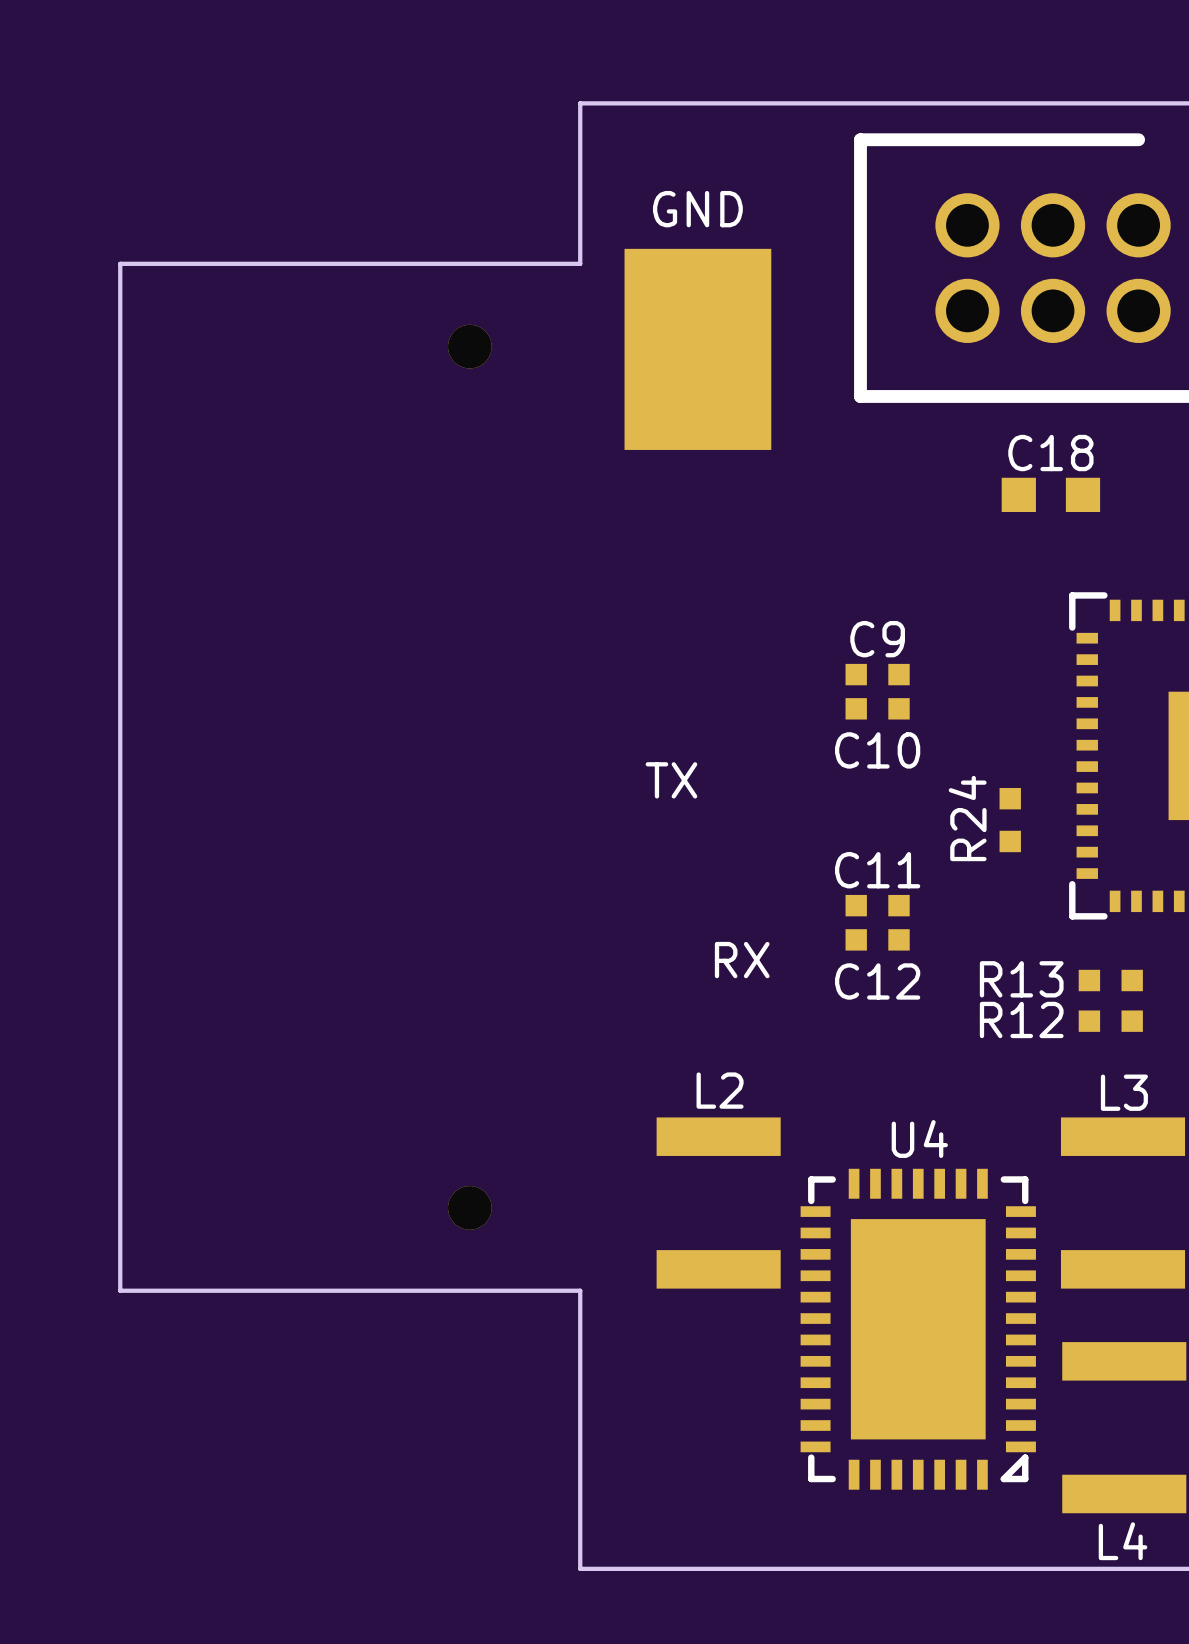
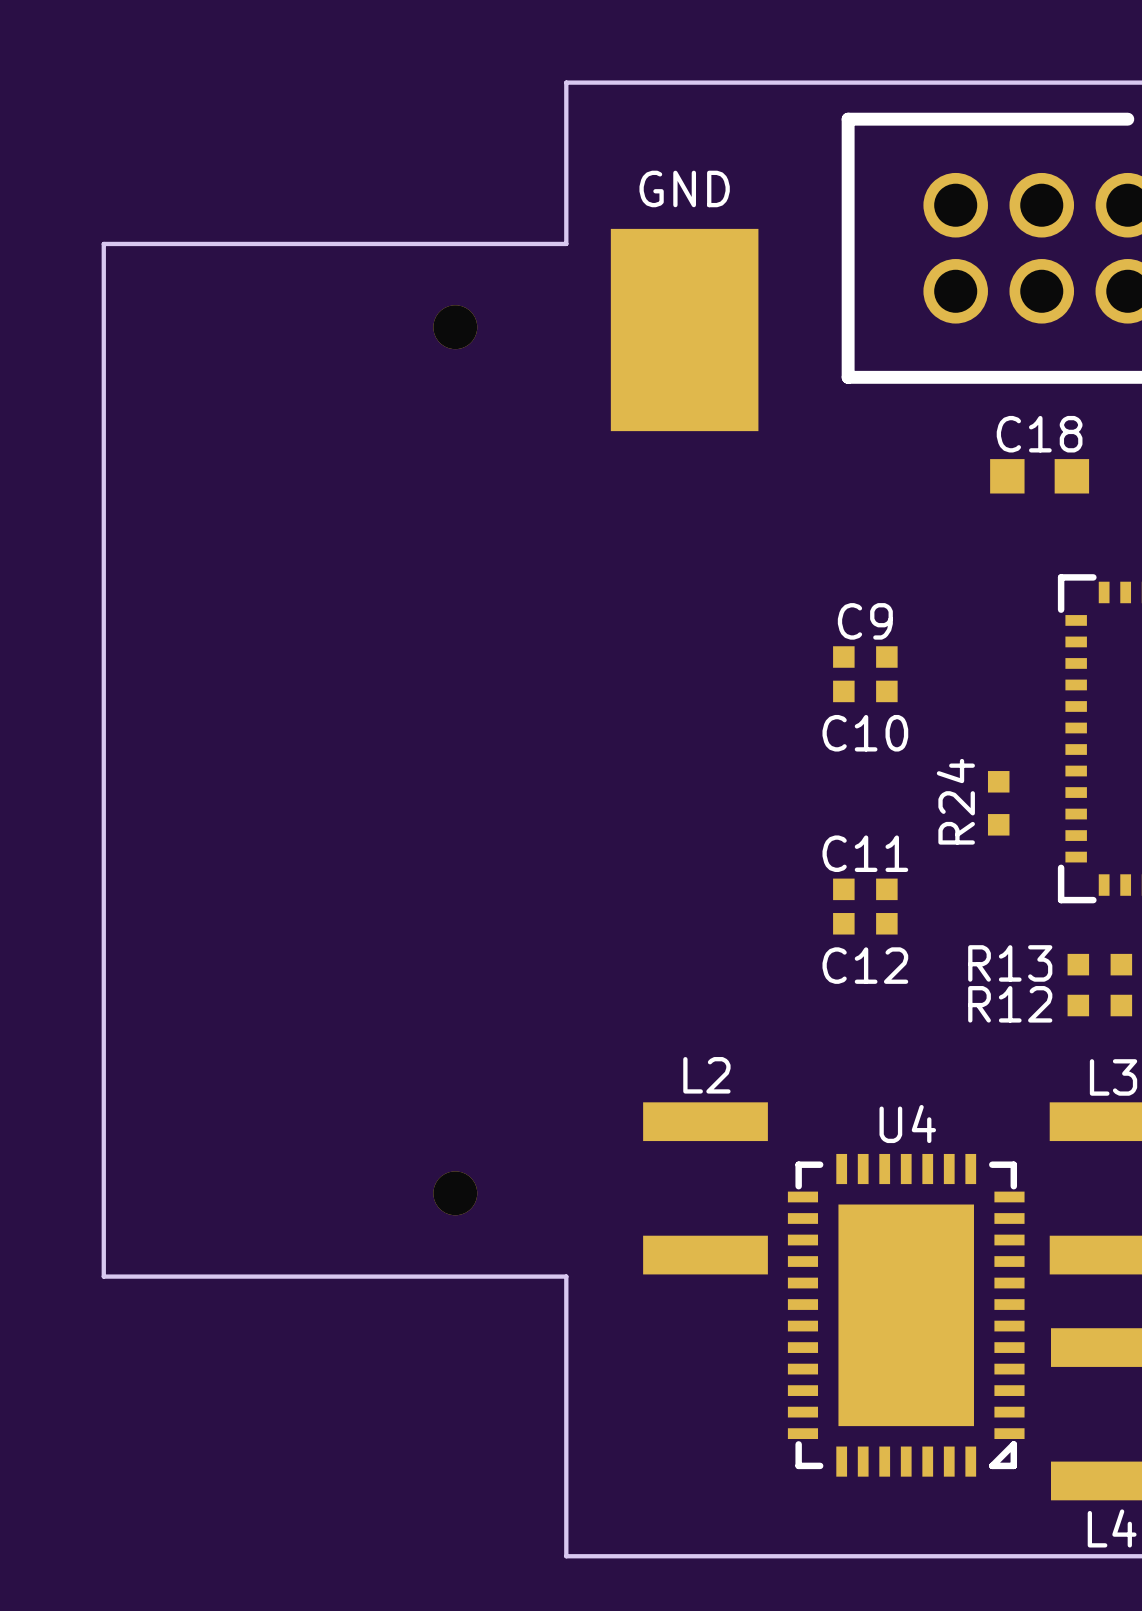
text: TX (671, 780) -> none
text: RX (742, 960) -> none

